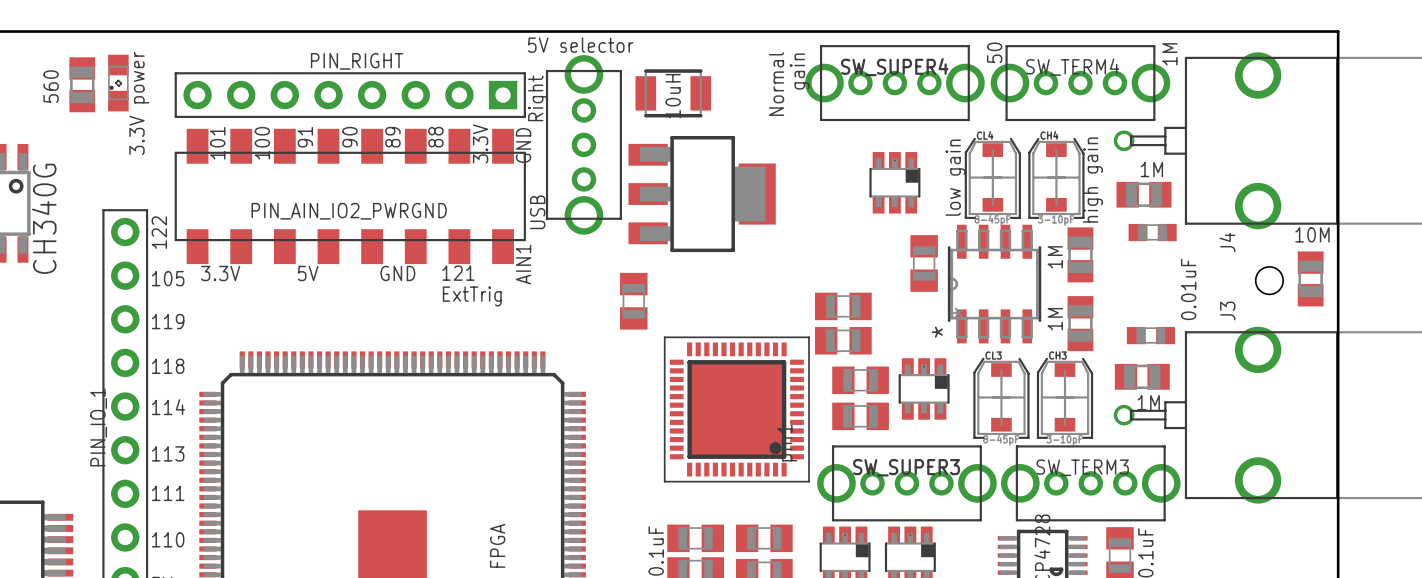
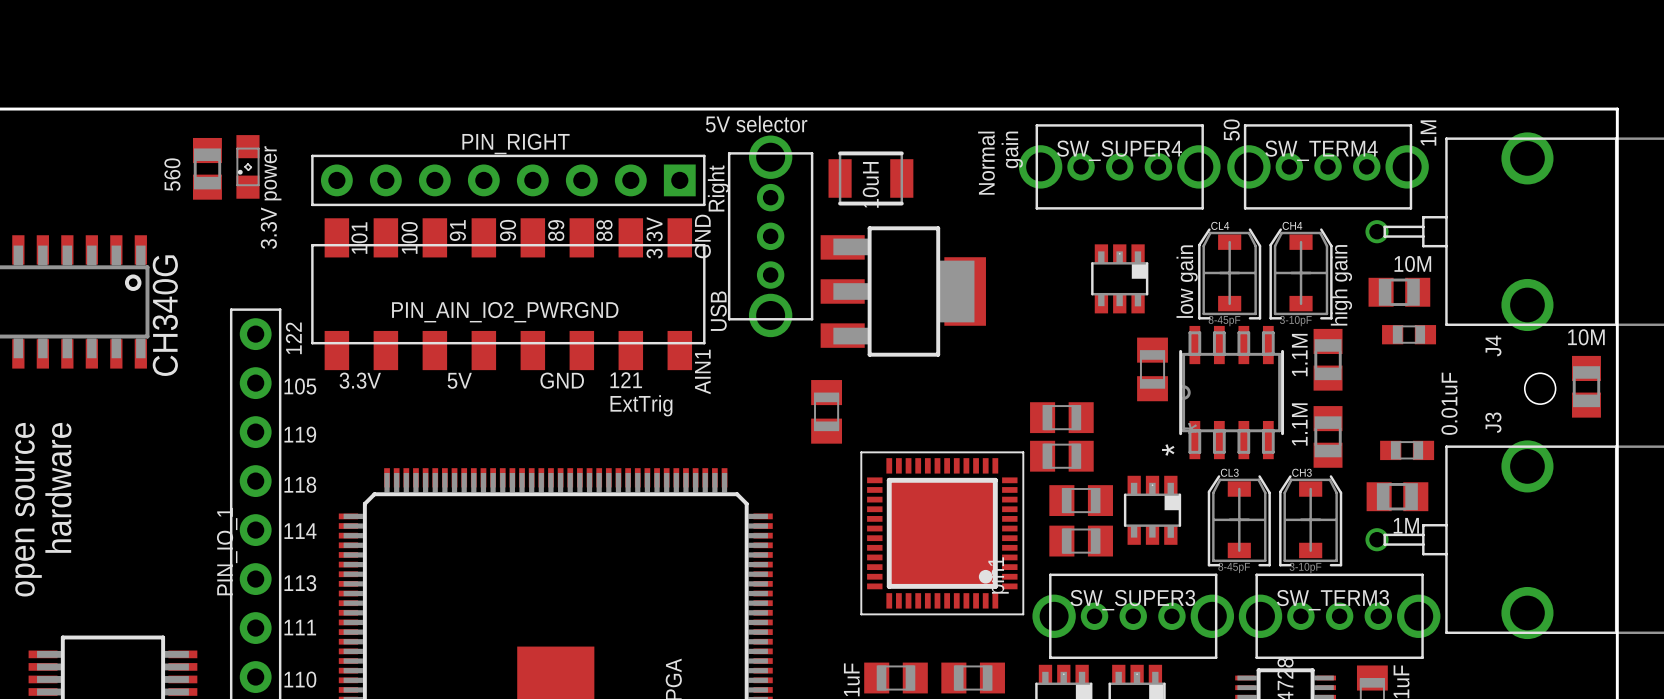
part value: 1M (1151, 169) -> 10M (1412, 263)
part value: 1M (1055, 257) -> 1.1M (1299, 355)
part value: 1M (1055, 319) -> 1.1M (1299, 424)

